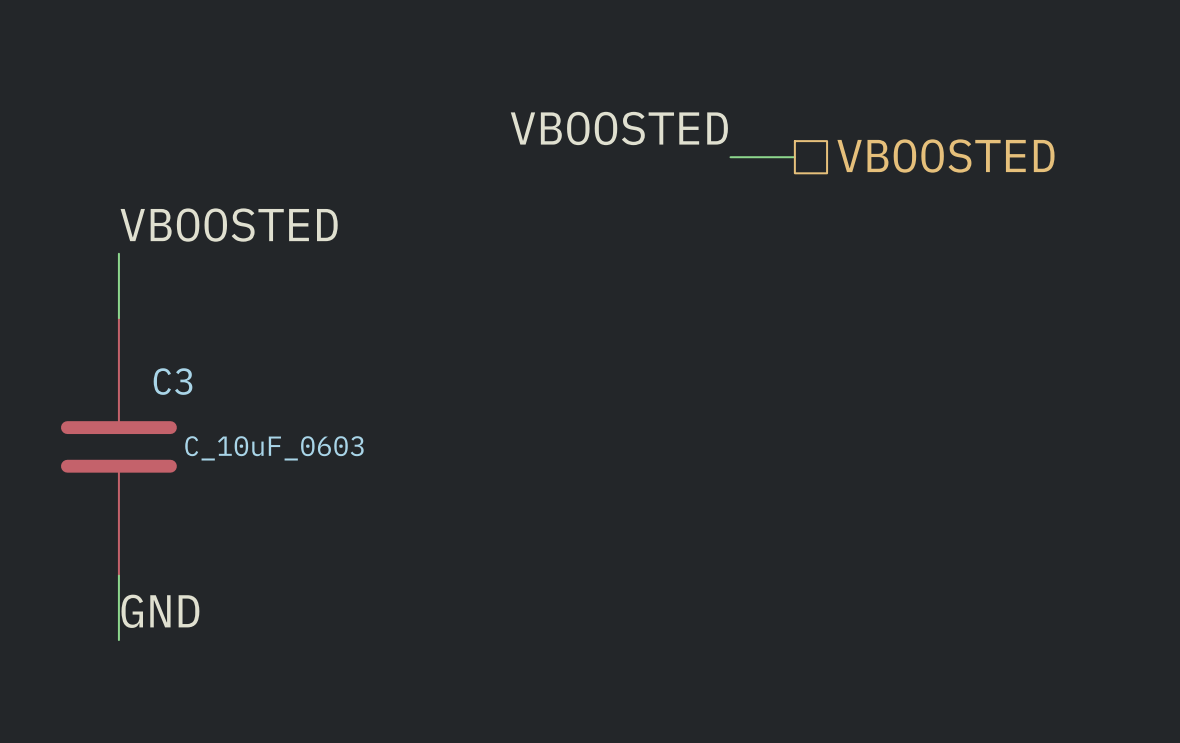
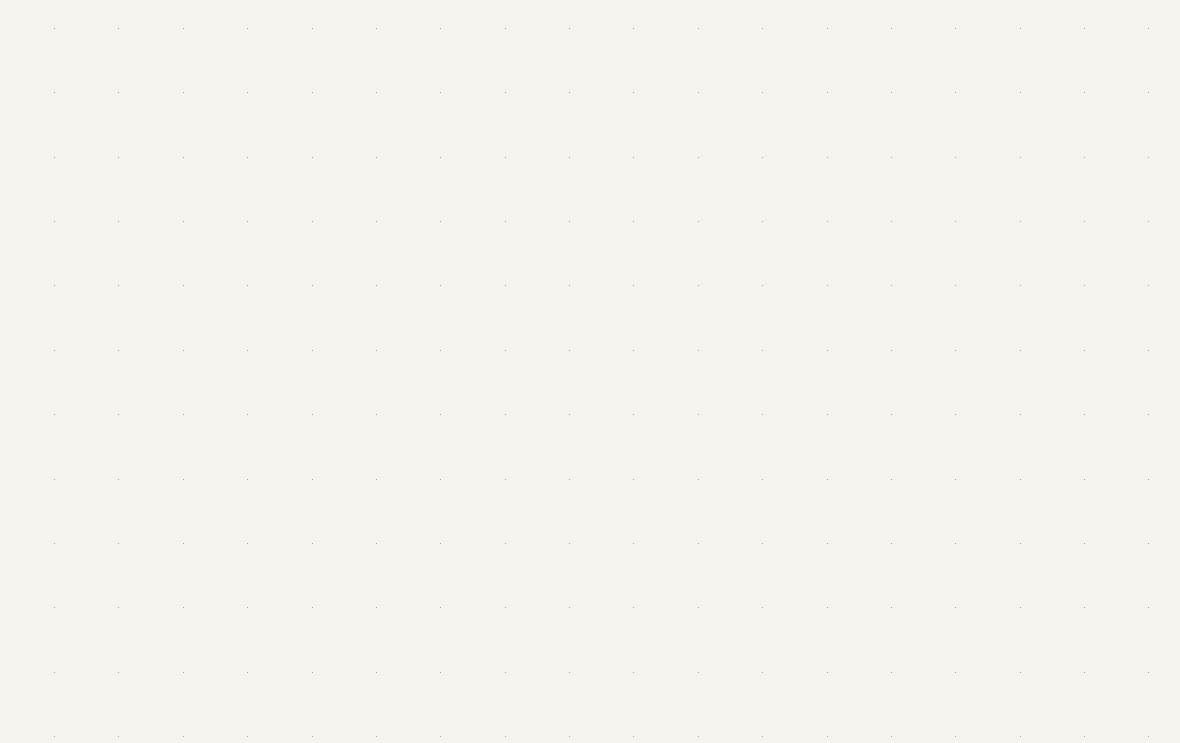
label: VBOOSTED (619, 128) -> none
hierarchical label: VBOOSTED (945, 156) -> none
wire: (730, 157) (794, 157) -> none
label: VBOOSTED (229, 225) -> none
wire: (118, 253) (118, 318) -> none
C3: C_10uF_0603 (118, 446) -> none
wire: (118, 575) (118, 640) -> none
label: GND (160, 611) -> none

